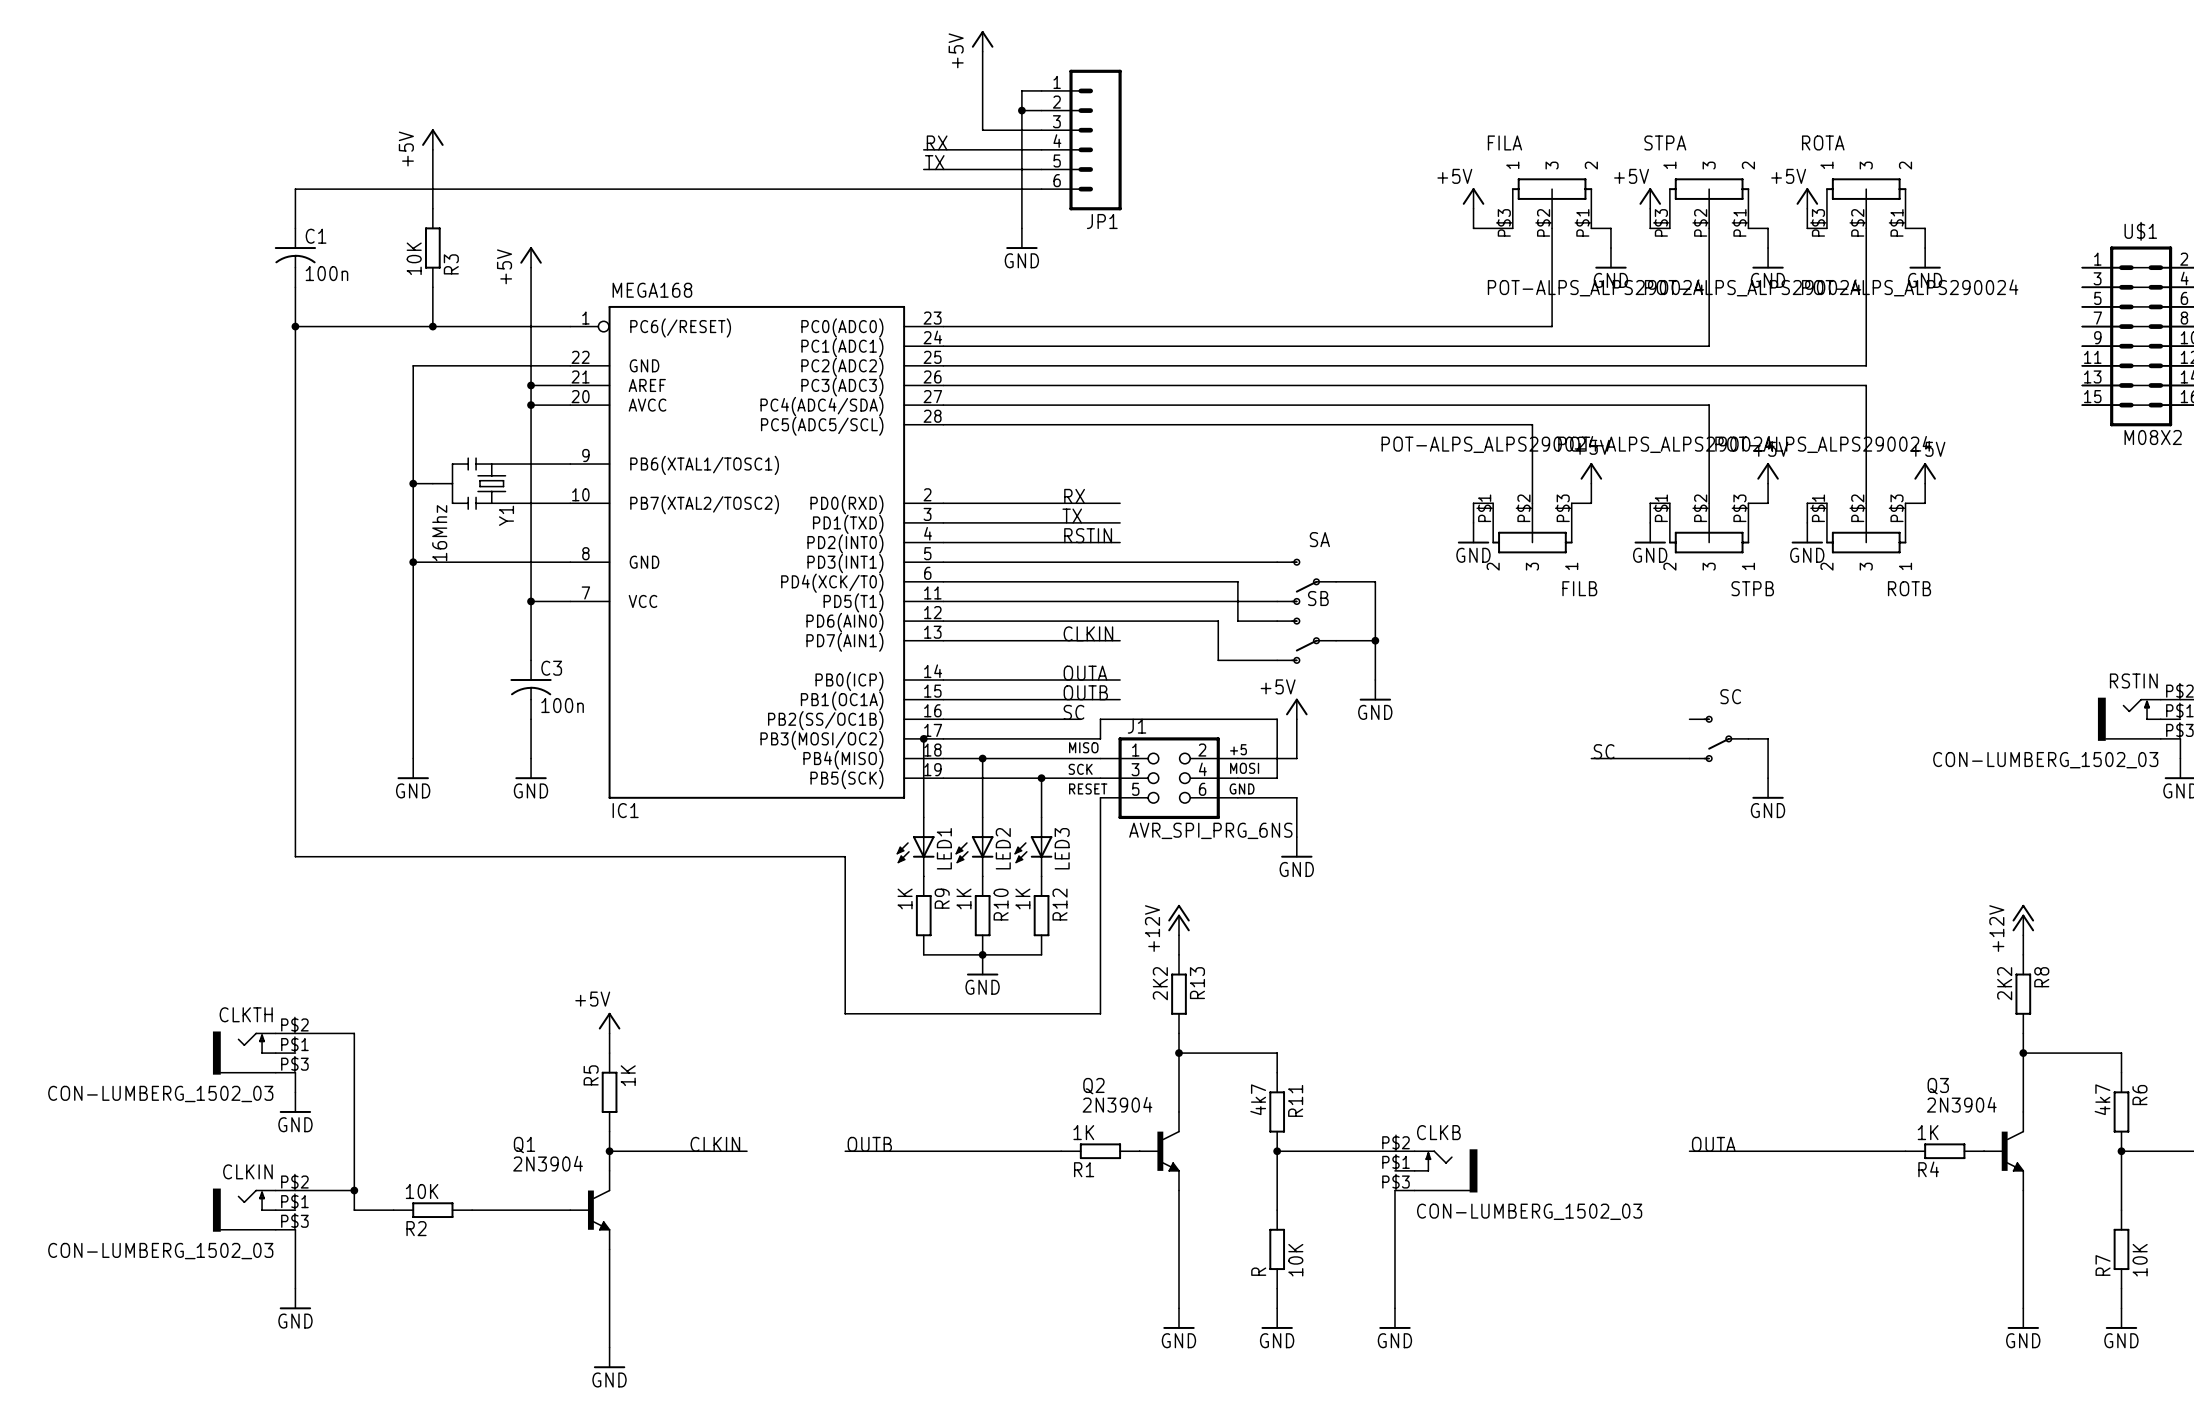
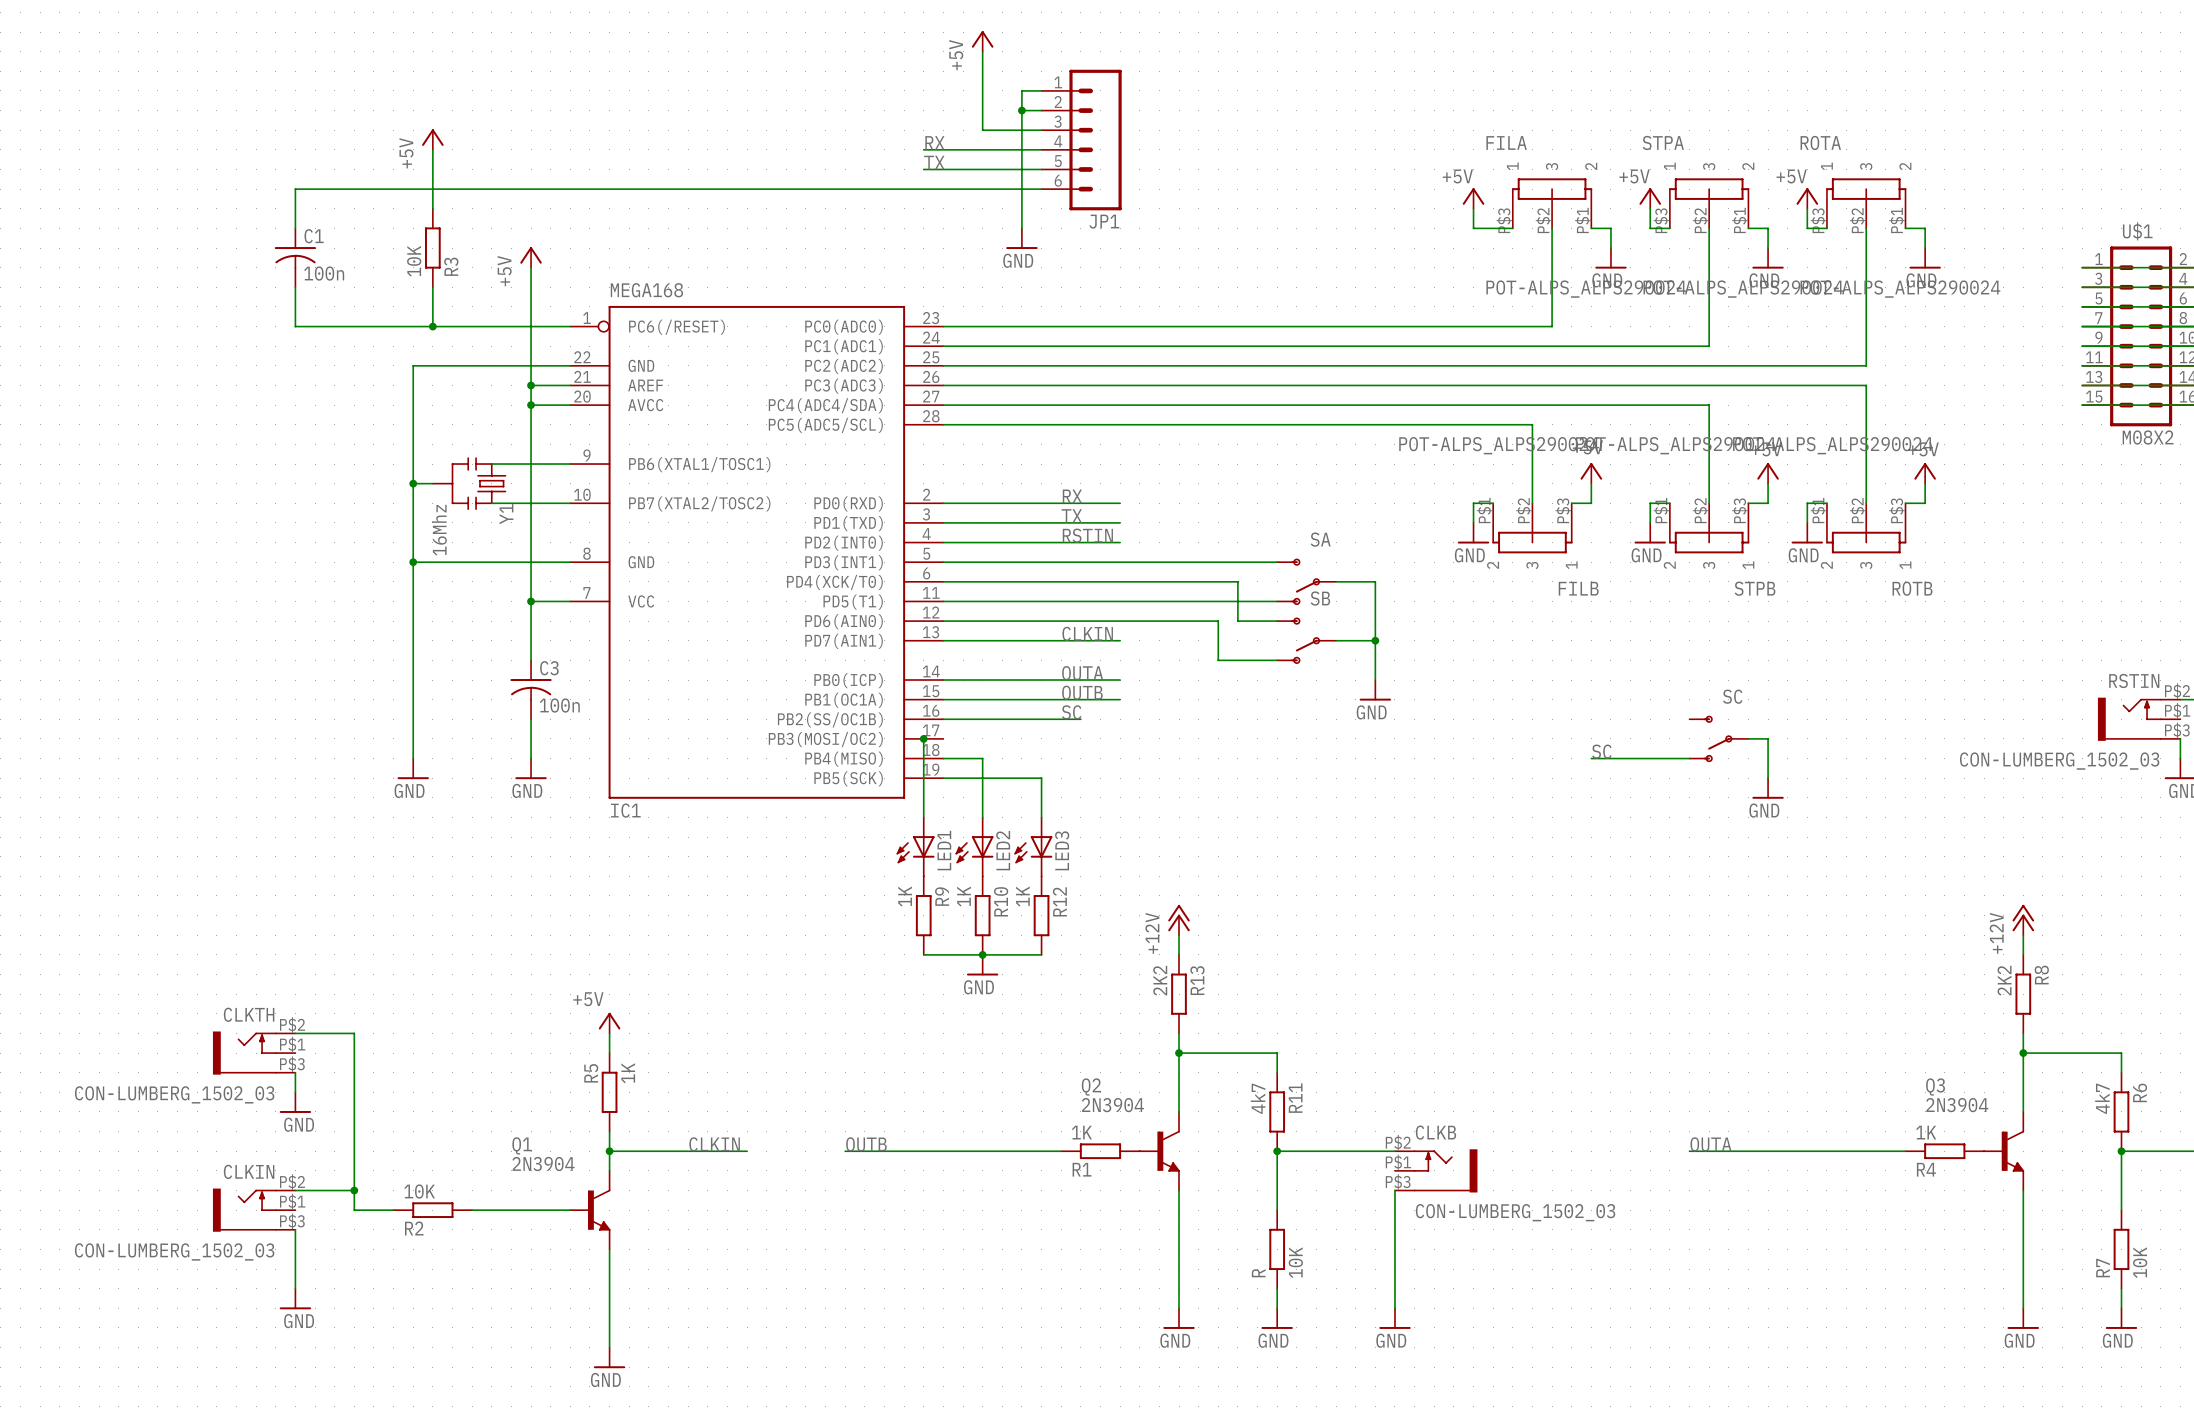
wire: (295, 326) (295, 856) (845, 856) (845, 1013) (1100, 1013) (1100, 797) -> none
junction: (295, 326) -> none
power symbol: +5V (1296, 708) -> none
wire: (1296, 719) (1296, 758) (1237, 758) -> none
wire: (943, 738) (1100, 738) (1100, 719) (1277, 719) (1277, 778) (1237, 778) -> none
wire: (982, 758) (1100, 758) -> none
junction: (982, 758) -> none
wire: (1041, 778) (1100, 778) -> none
junction: (1041, 778) -> none
J1: AVR_SPI_PRG_6NS (1169, 778) -> none
wire: (1237, 797) (1296, 797) (1296, 837) -> none
power symbol: GND (1296, 847) -> none

